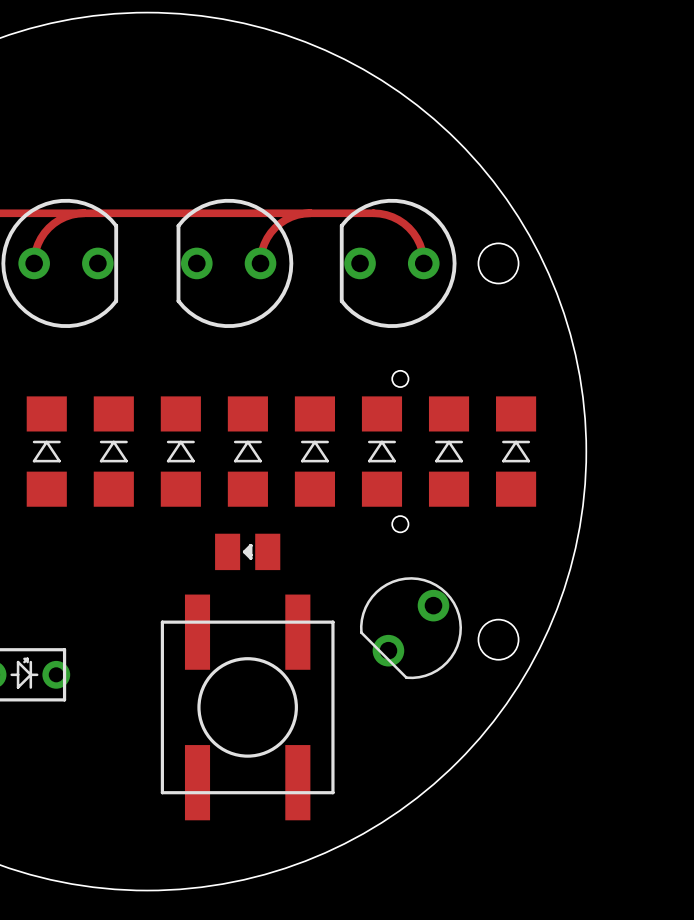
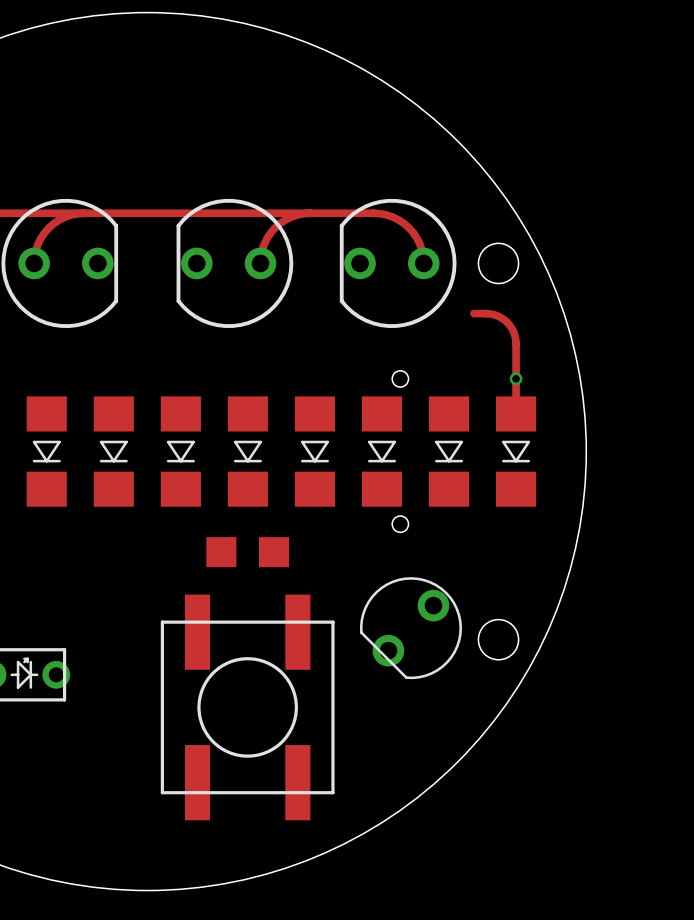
track: none -> (473, 313) (497, 315) (507, 322) (513, 332) (516, 343) (516, 413)
via: none -> (516, 378)
part rotation: 0° (46, 451) -> 180° (46, 451)
part rotation: 0° (113, 451) -> 180° (113, 451)
part rotation: 0° (180, 451) -> 180° (180, 451)
part rotation: 0° (247, 451) -> 180° (247, 451)
part rotation: 0° (314, 451) -> 180° (314, 451)
part rotation: 0° (381, 451) -> 180° (381, 451)
part rotation: 0° (449, 451) -> 180° (449, 451)
part rotation: 0° (516, 451) -> 180° (516, 451)
part footprint: [215, 533, 281, 571] -> [206, 537, 290, 568]

